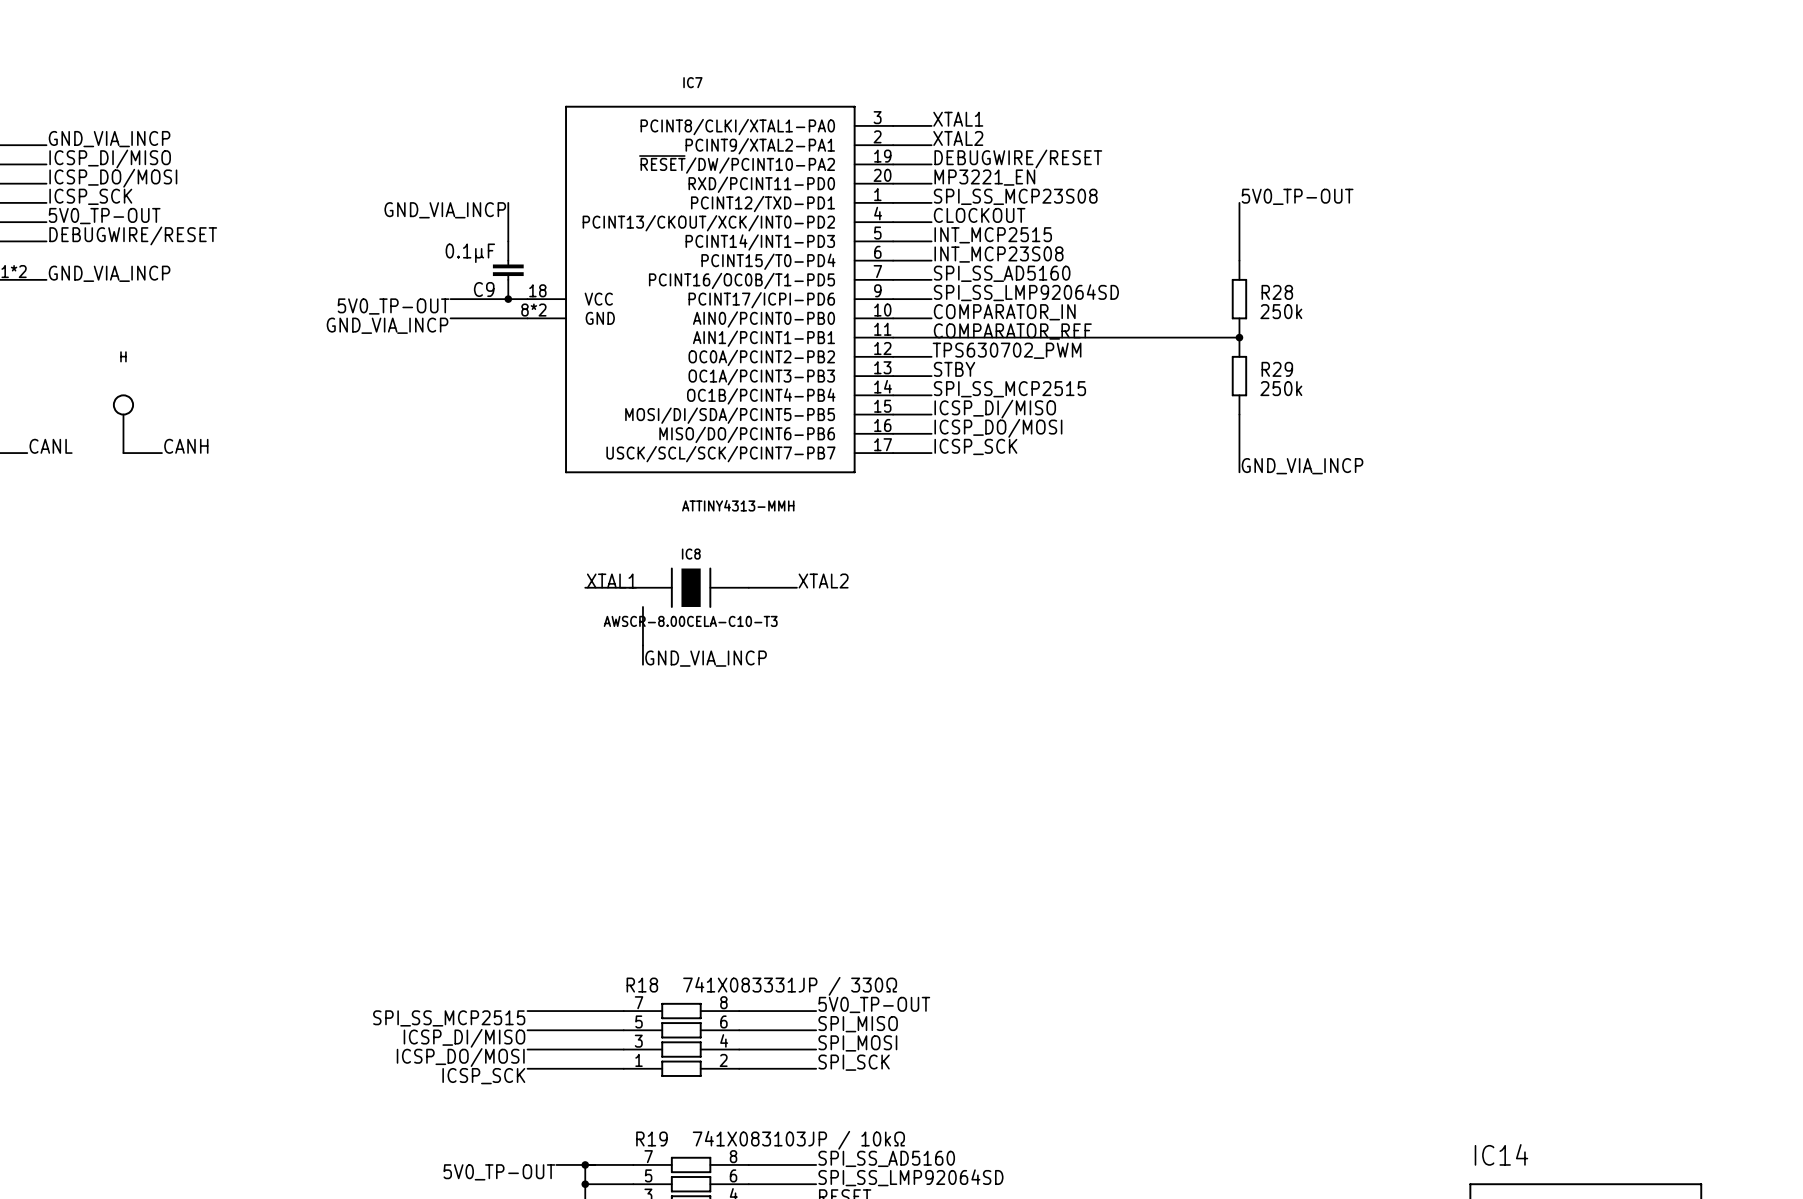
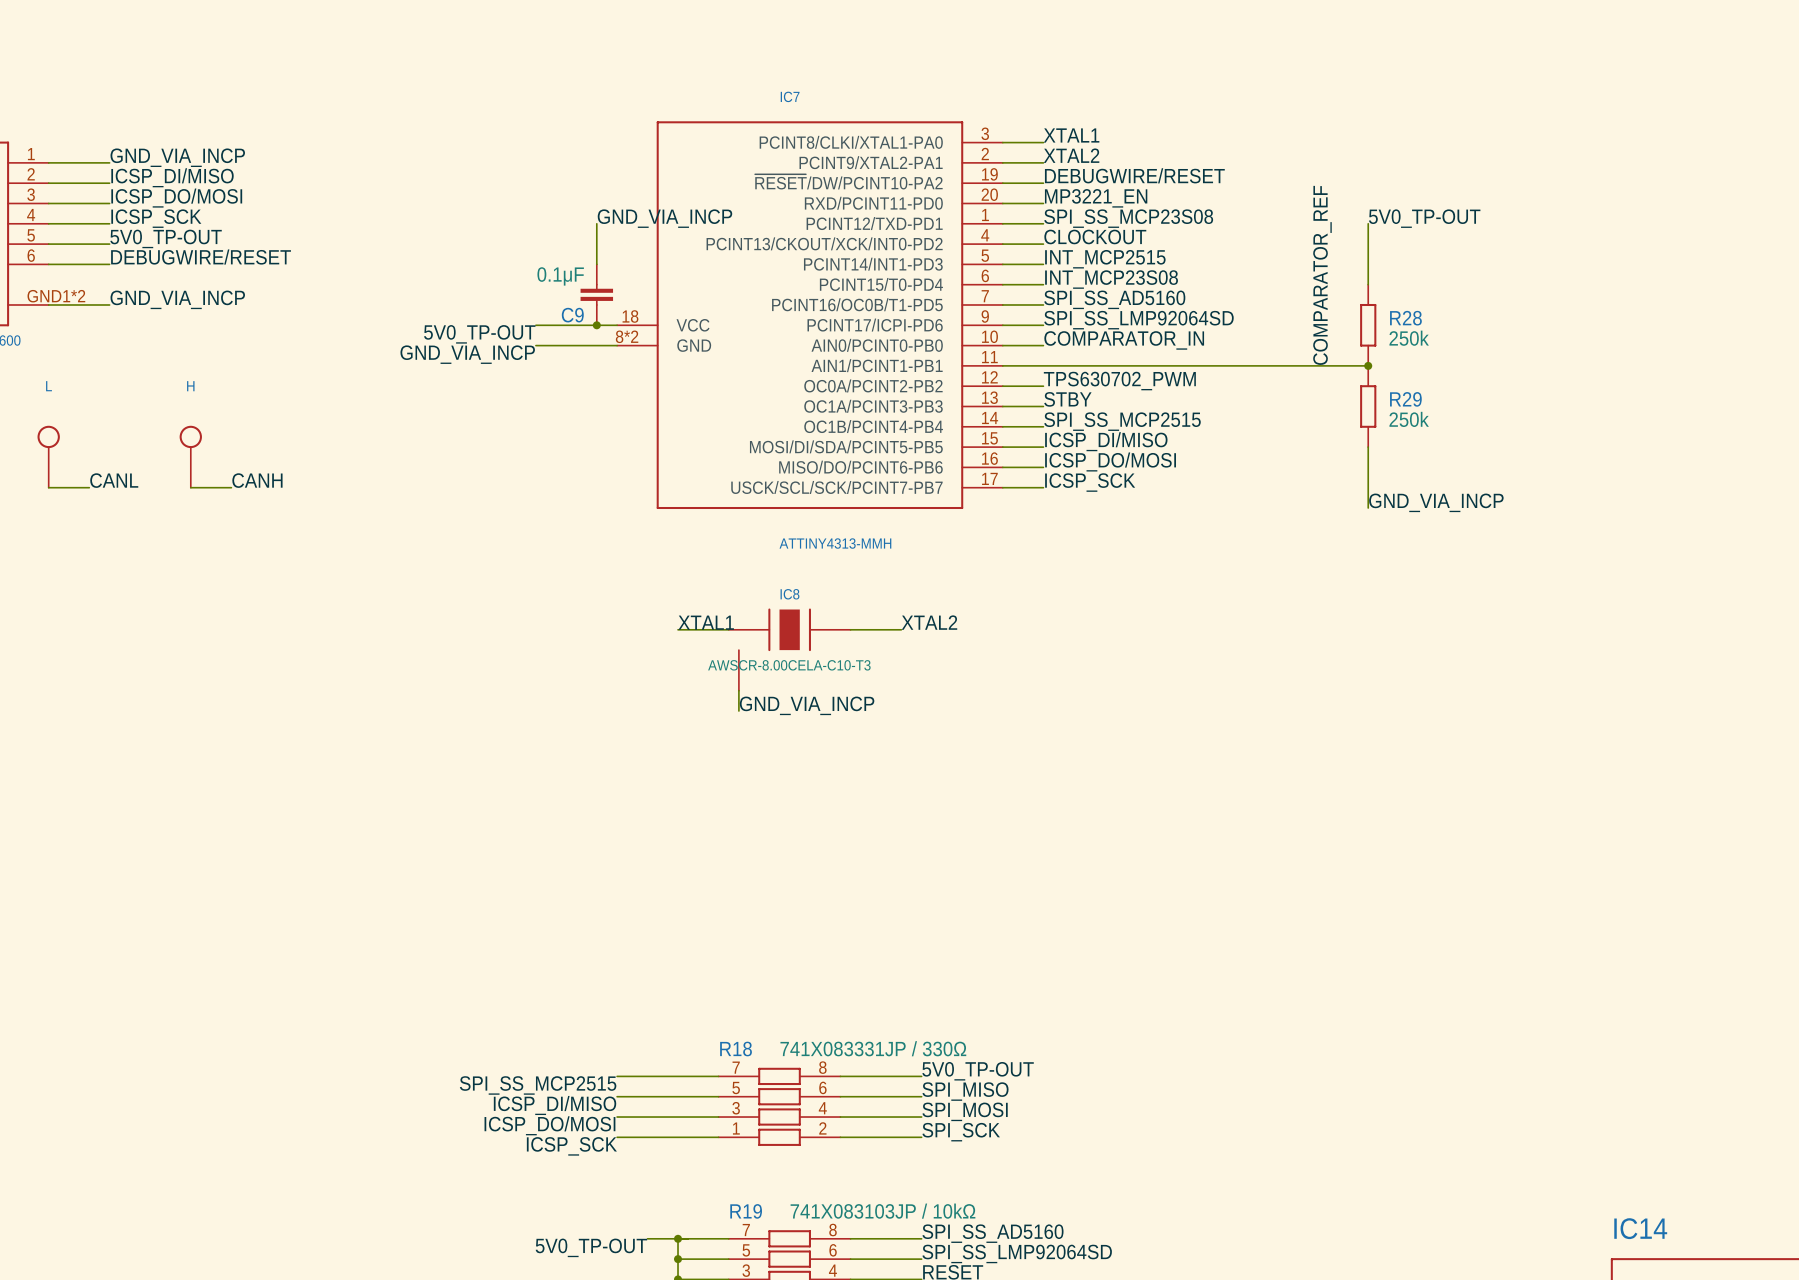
label position: GND_VIA_INCP (445, 210) -> GND_VIA_INCP (664, 218)
label: none -> COMPARATOR_REF (1322, 275)
label: COMPARATOR_REF (1012, 331) -> none

